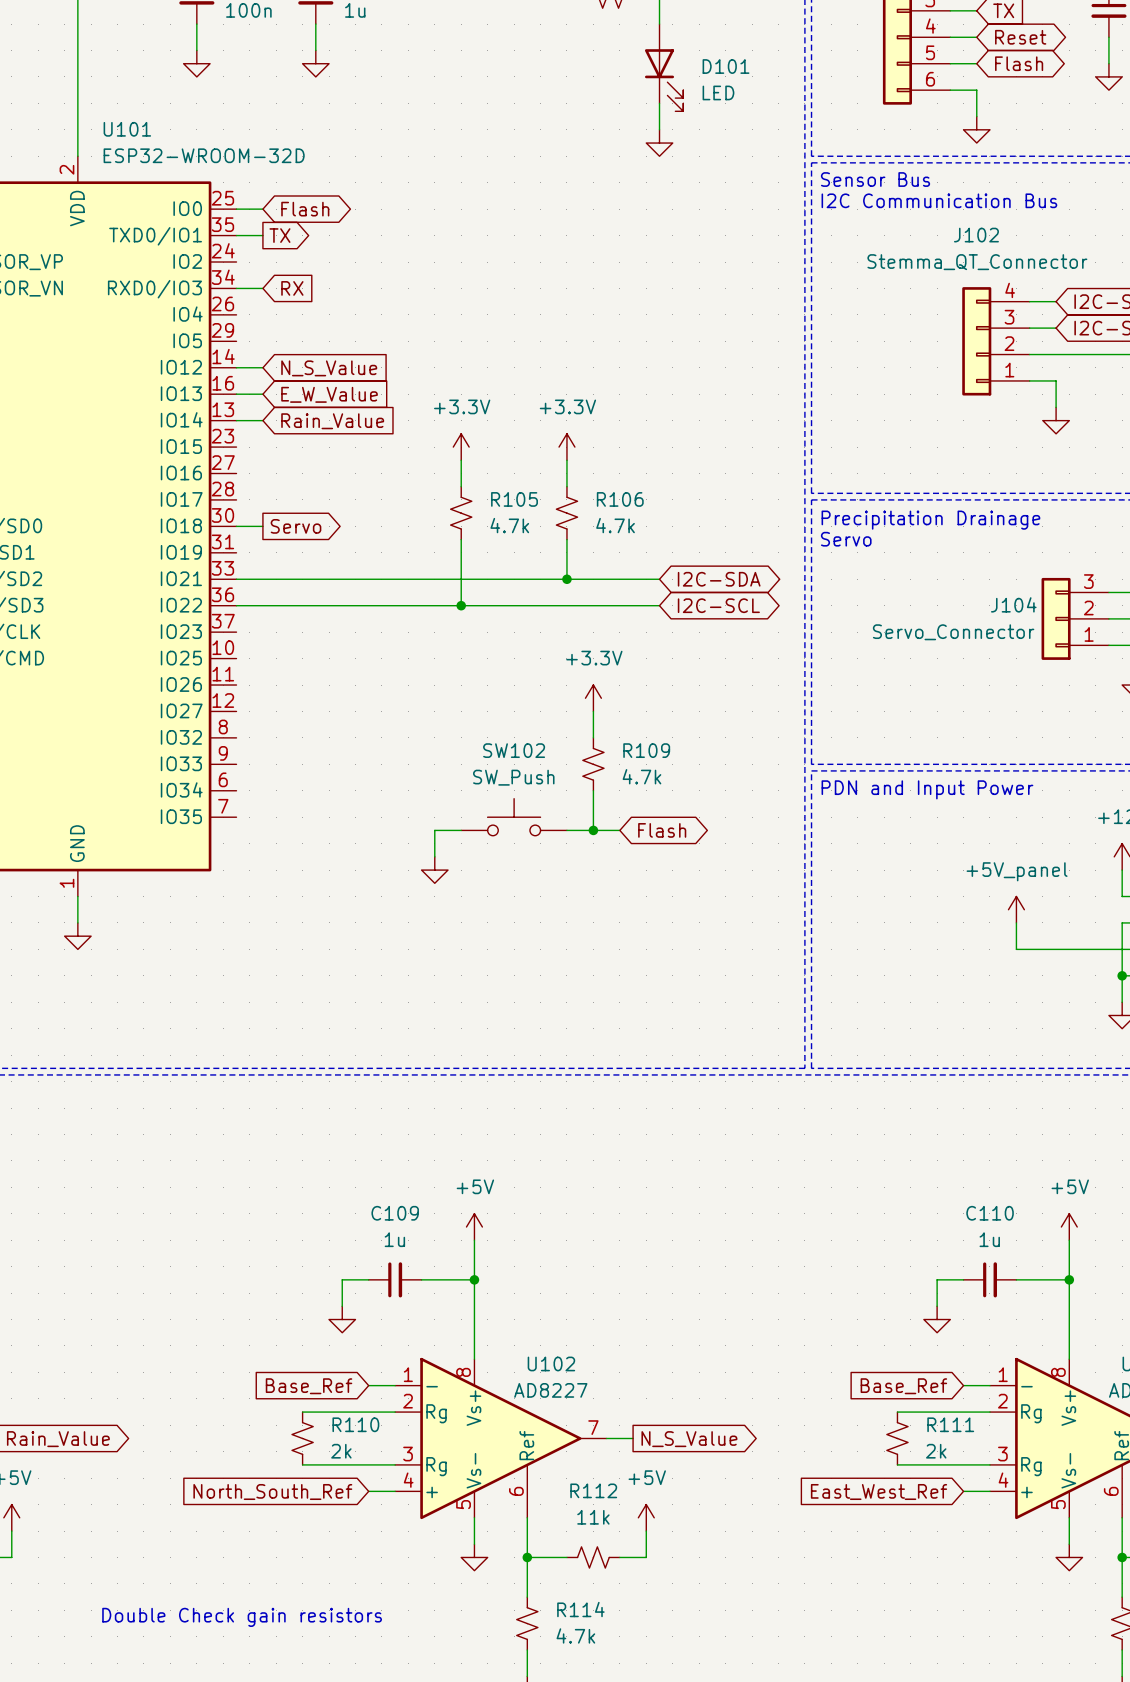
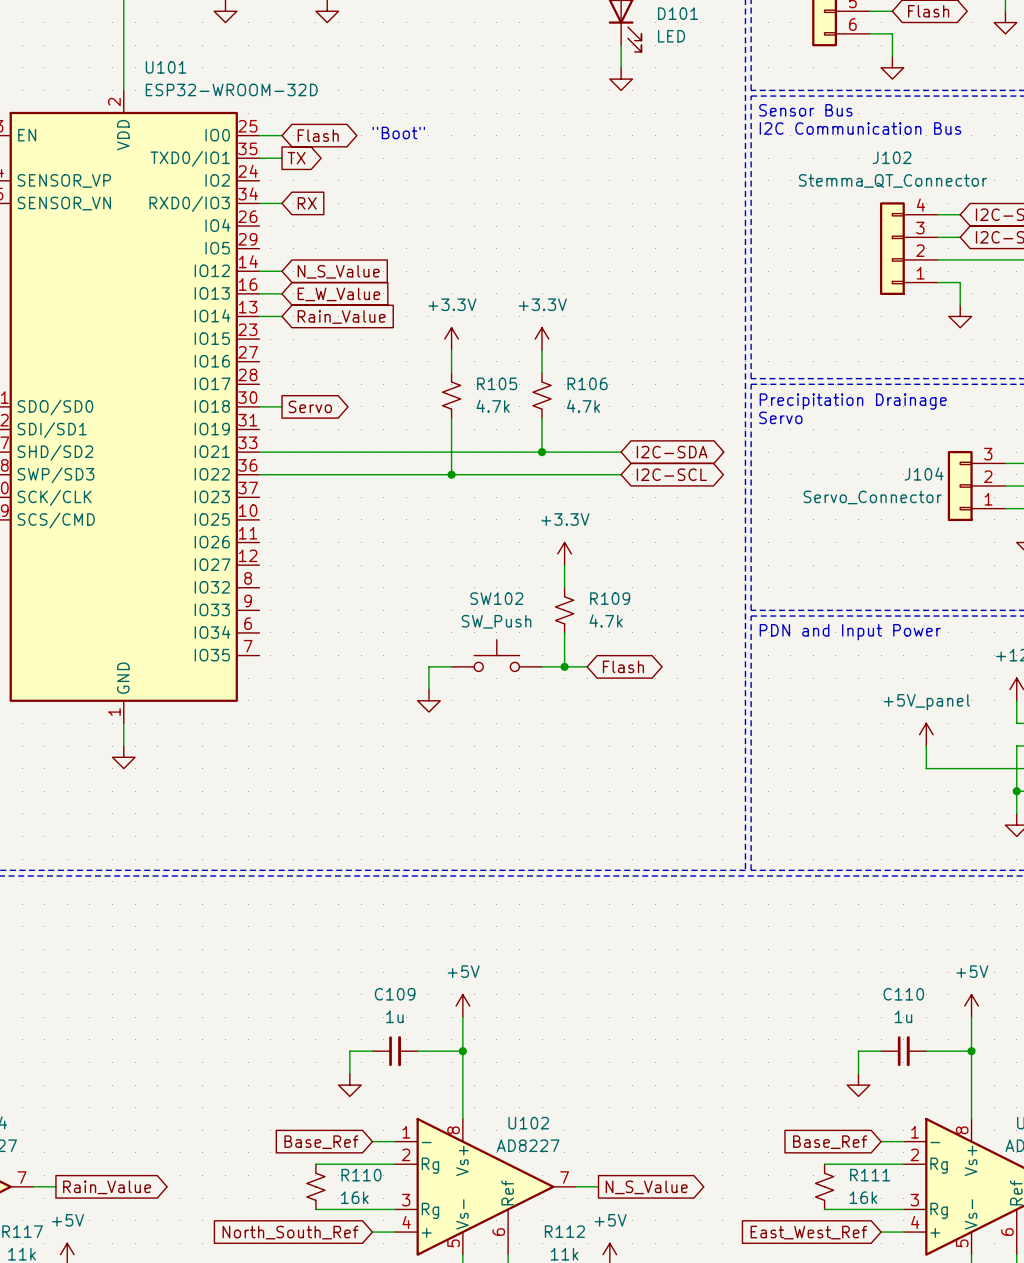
text: none -> "Boot" (398, 132)
R110 value: 2k (341, 1451) -> 16k (354, 1197)
R111 value: 2k (936, 1451) -> 16k (863, 1197)

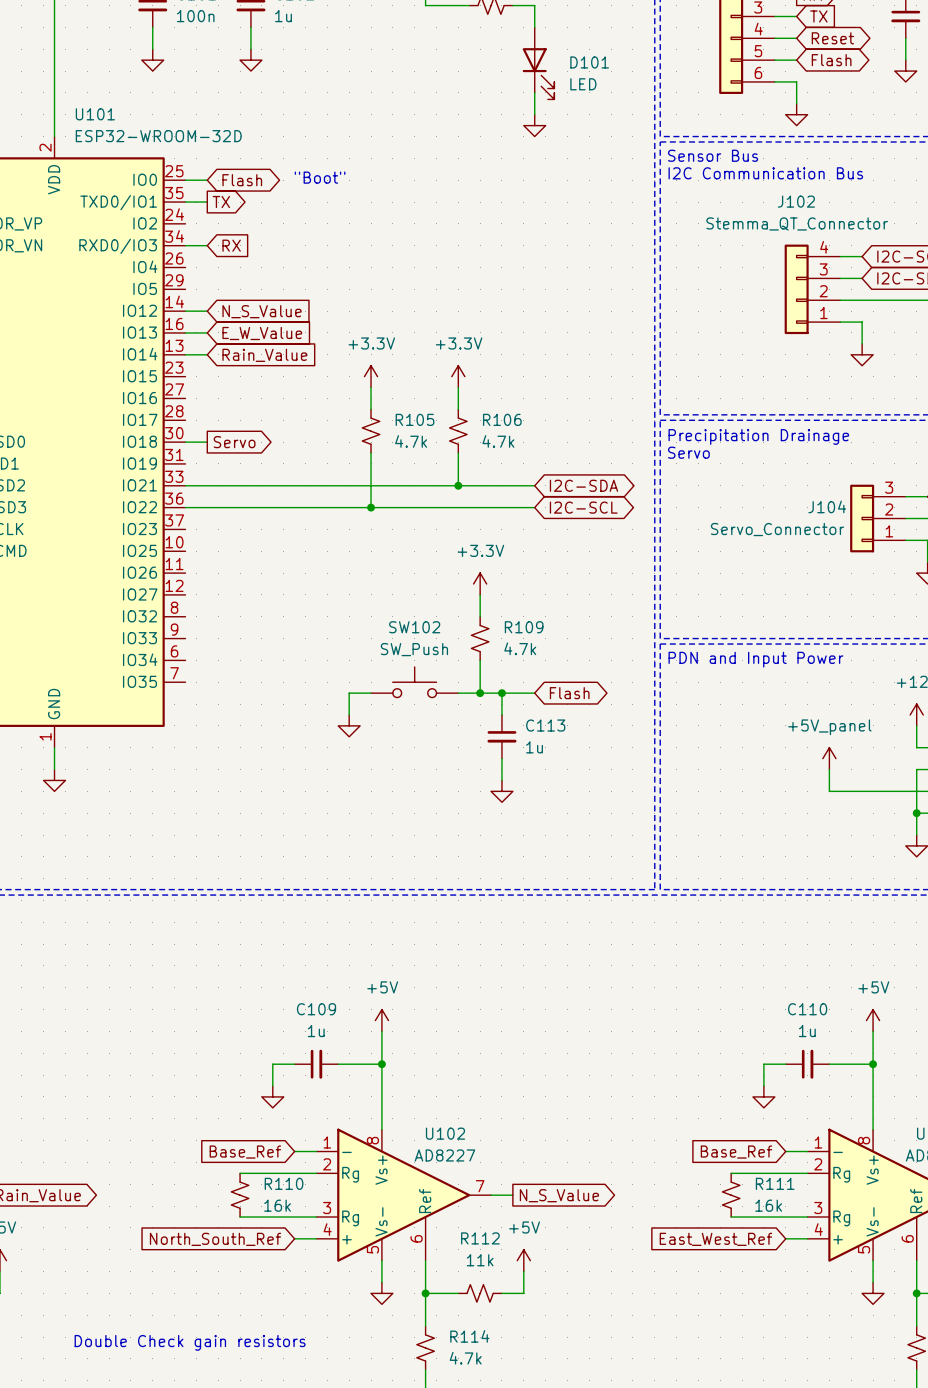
junction: none -> (501, 693)
wire: none -> (534, 693) (501, 693) (501, 714)
global label position: Flash (623, 666) -> Flash (569, 693)
C113: none -> 1u (501, 736)
wire: none -> (501, 758) (501, 780)
power symbol: none -> (501, 791)

